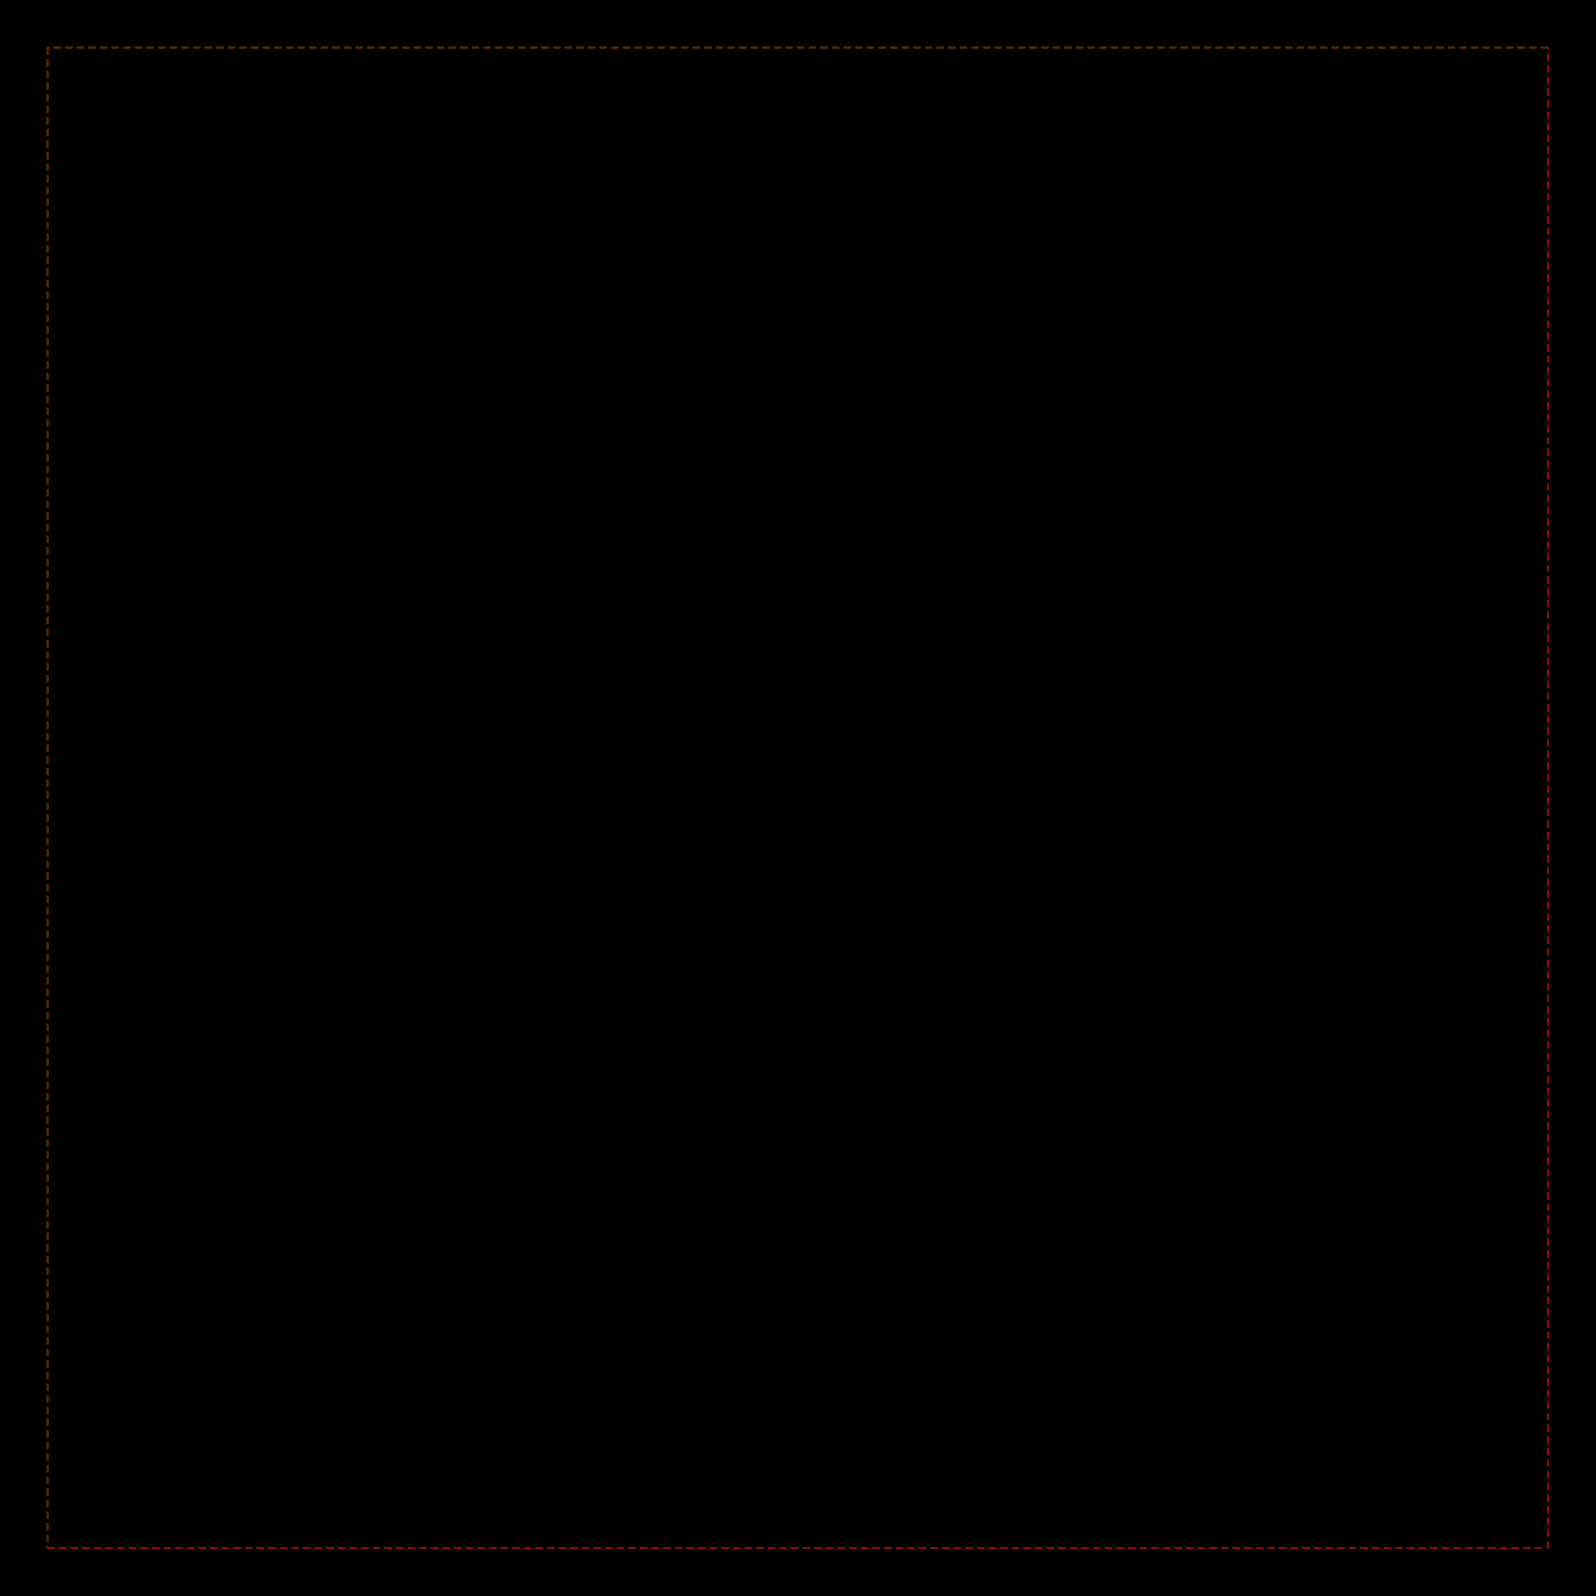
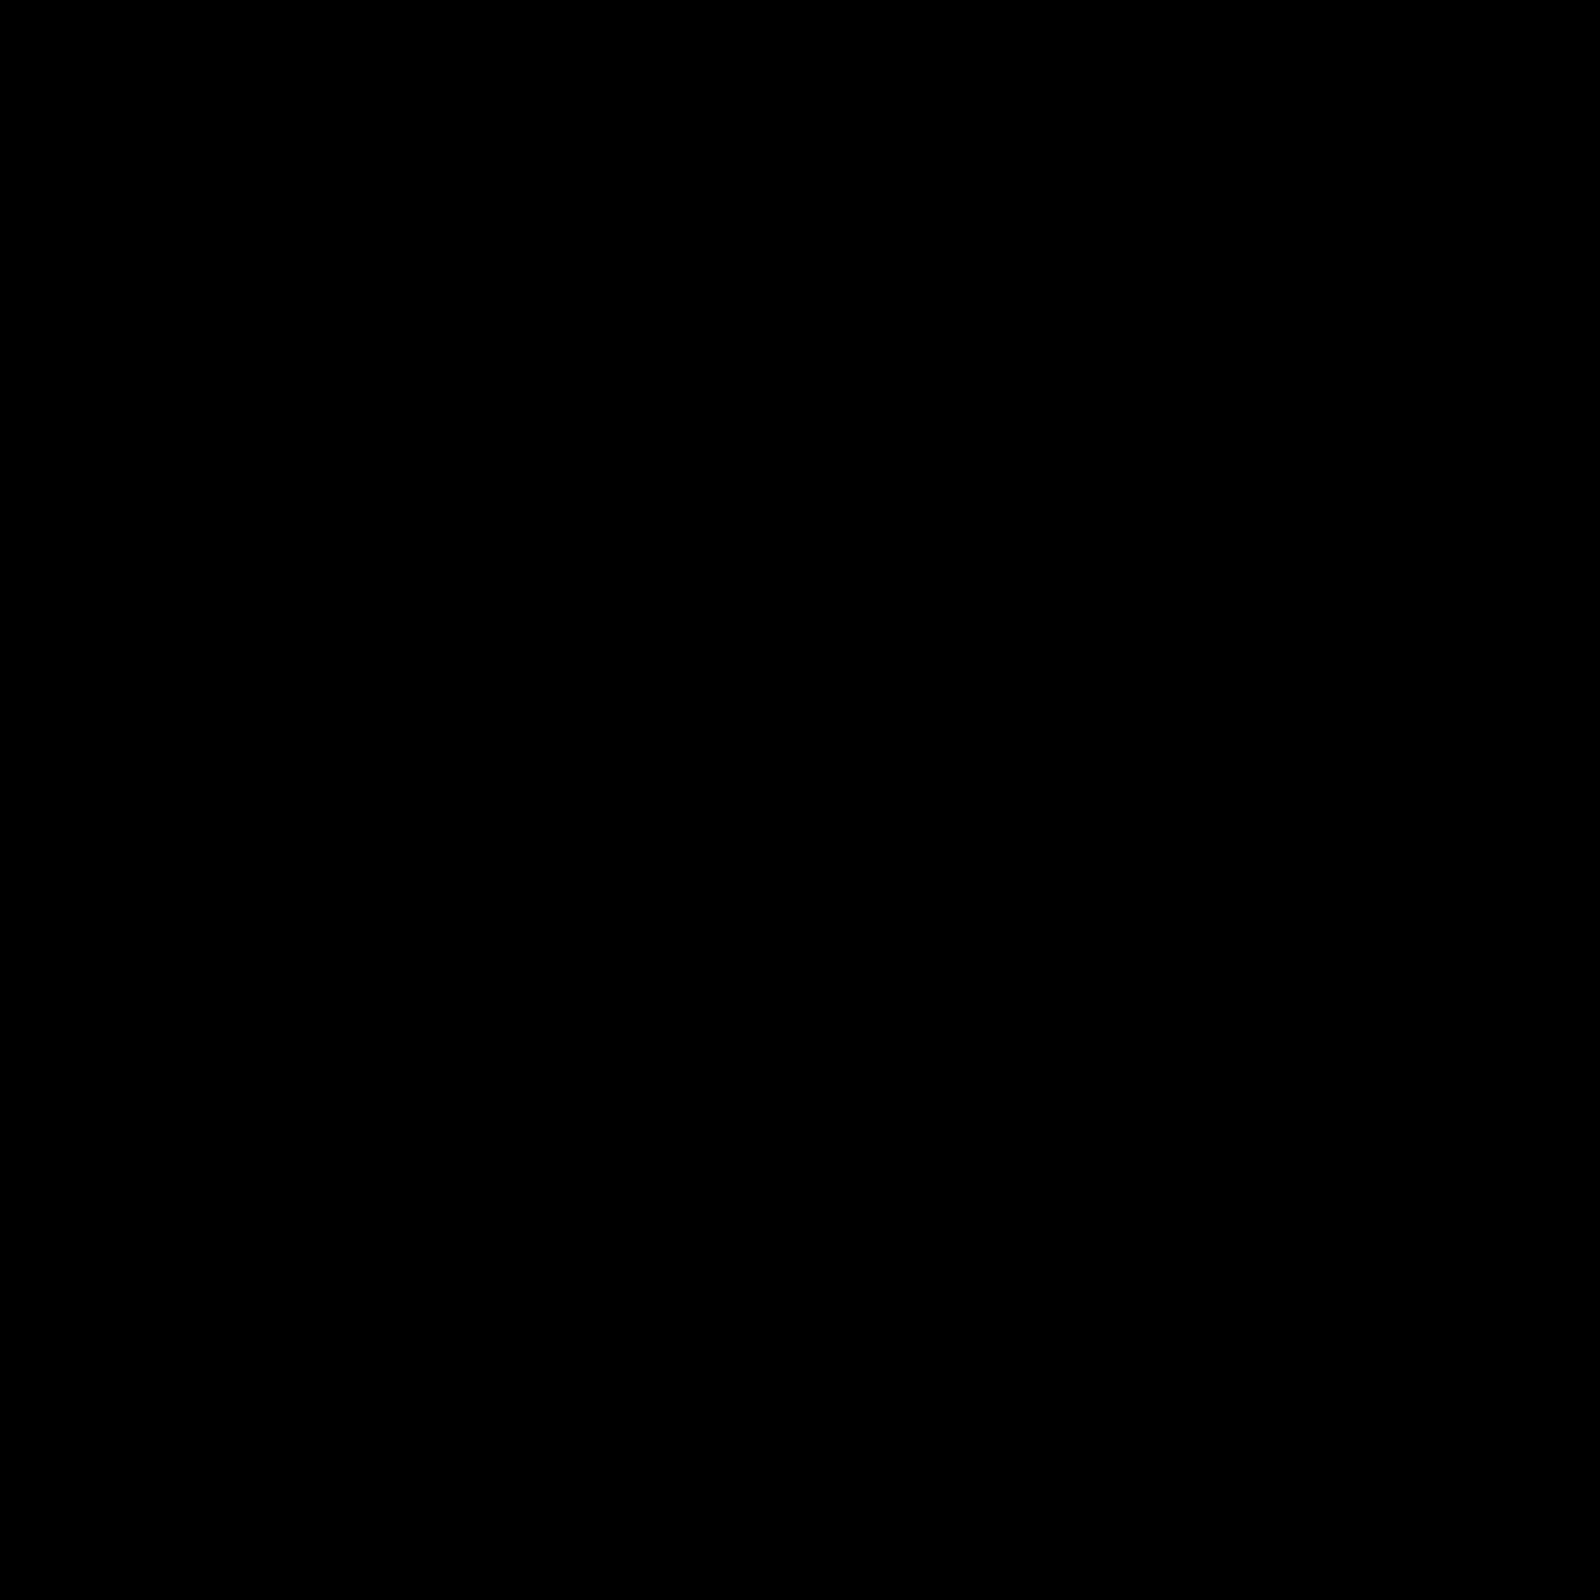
top zone outline: (47, 47) (47, 1548) (1548, 1548) (1548, 47) (47, 47) -> none

